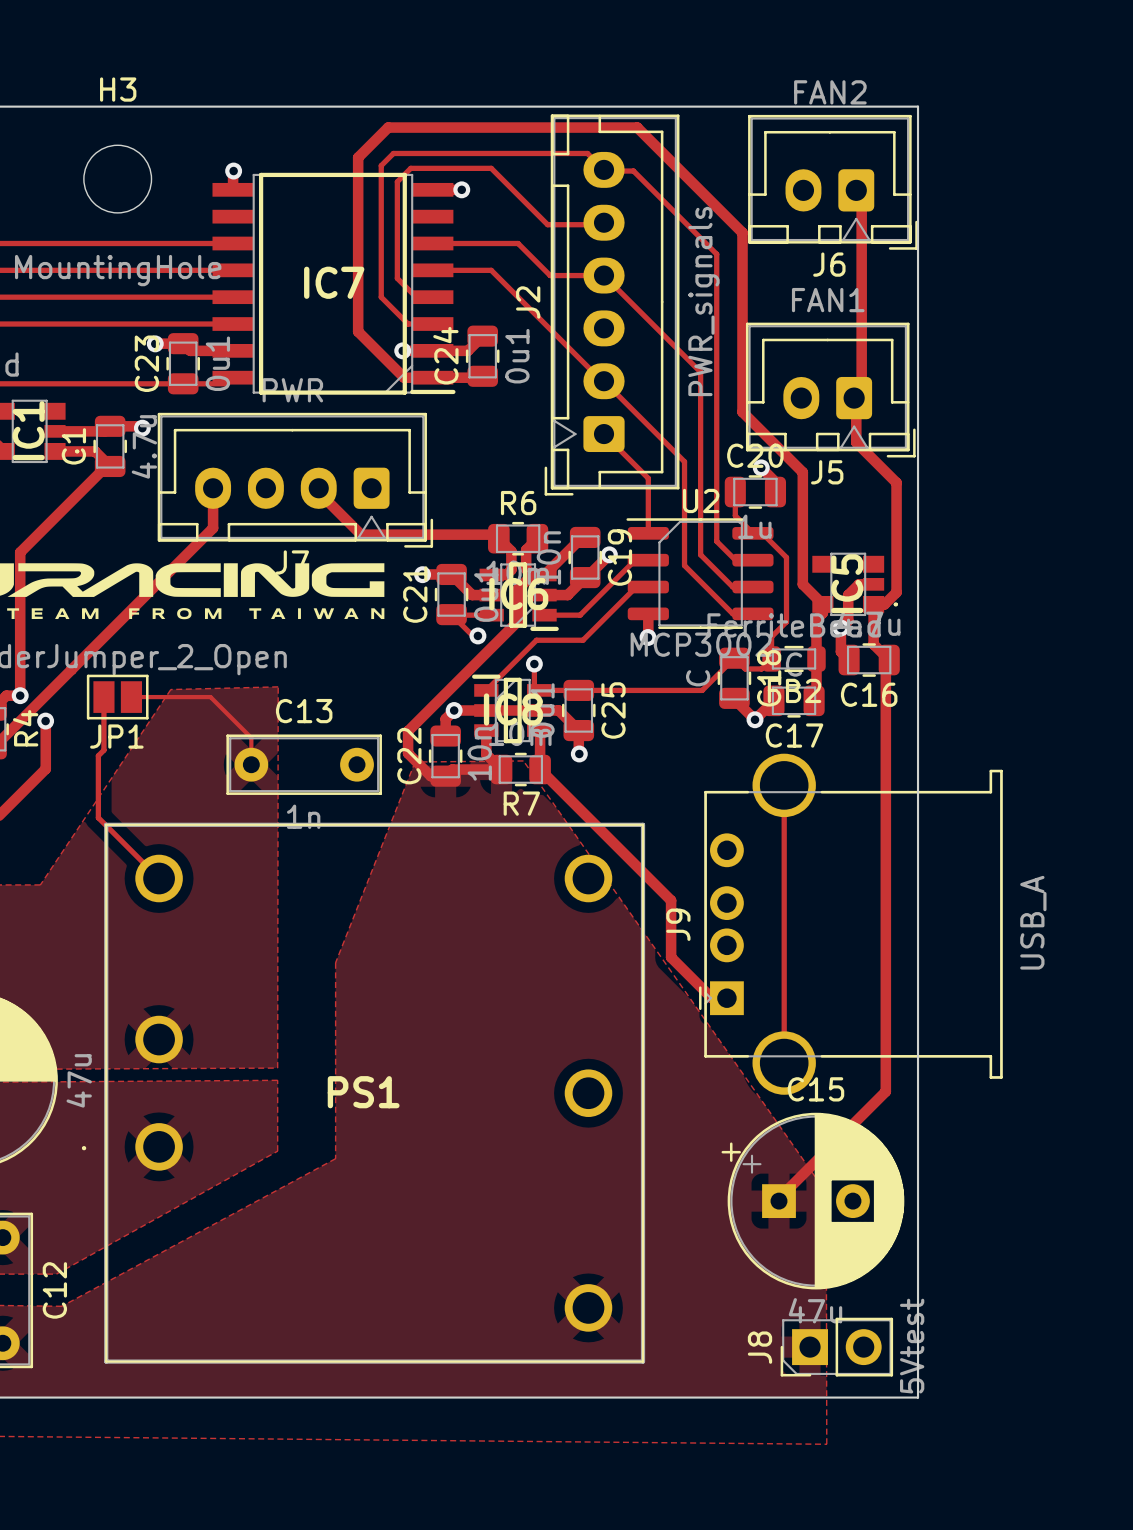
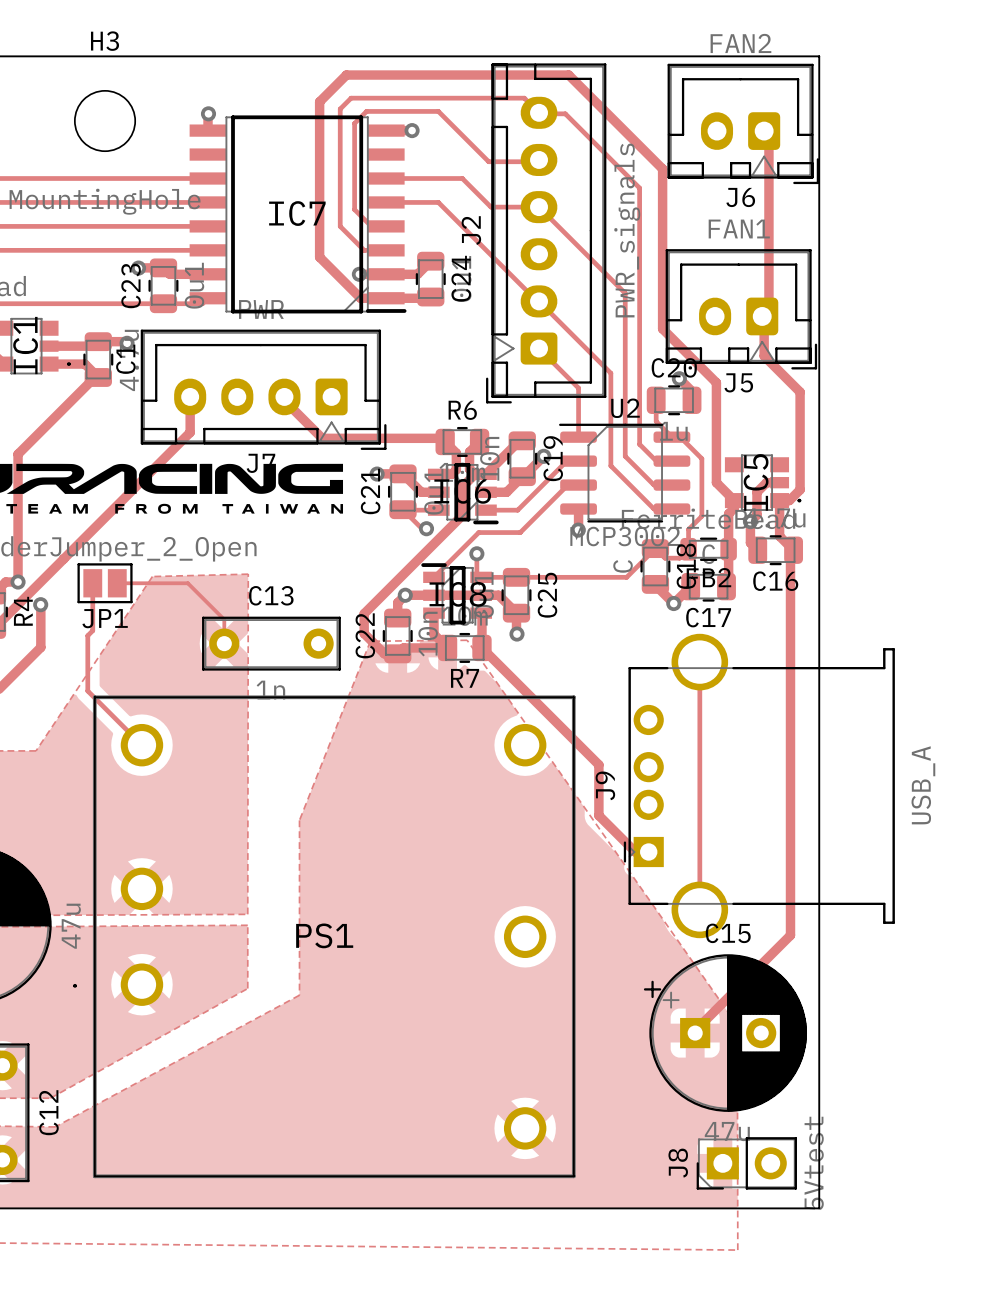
C24 name position: C24 (445, 355) -> C24 (461, 278)
C1 name position: C1 (73, 446) -> C1 (125, 359)

